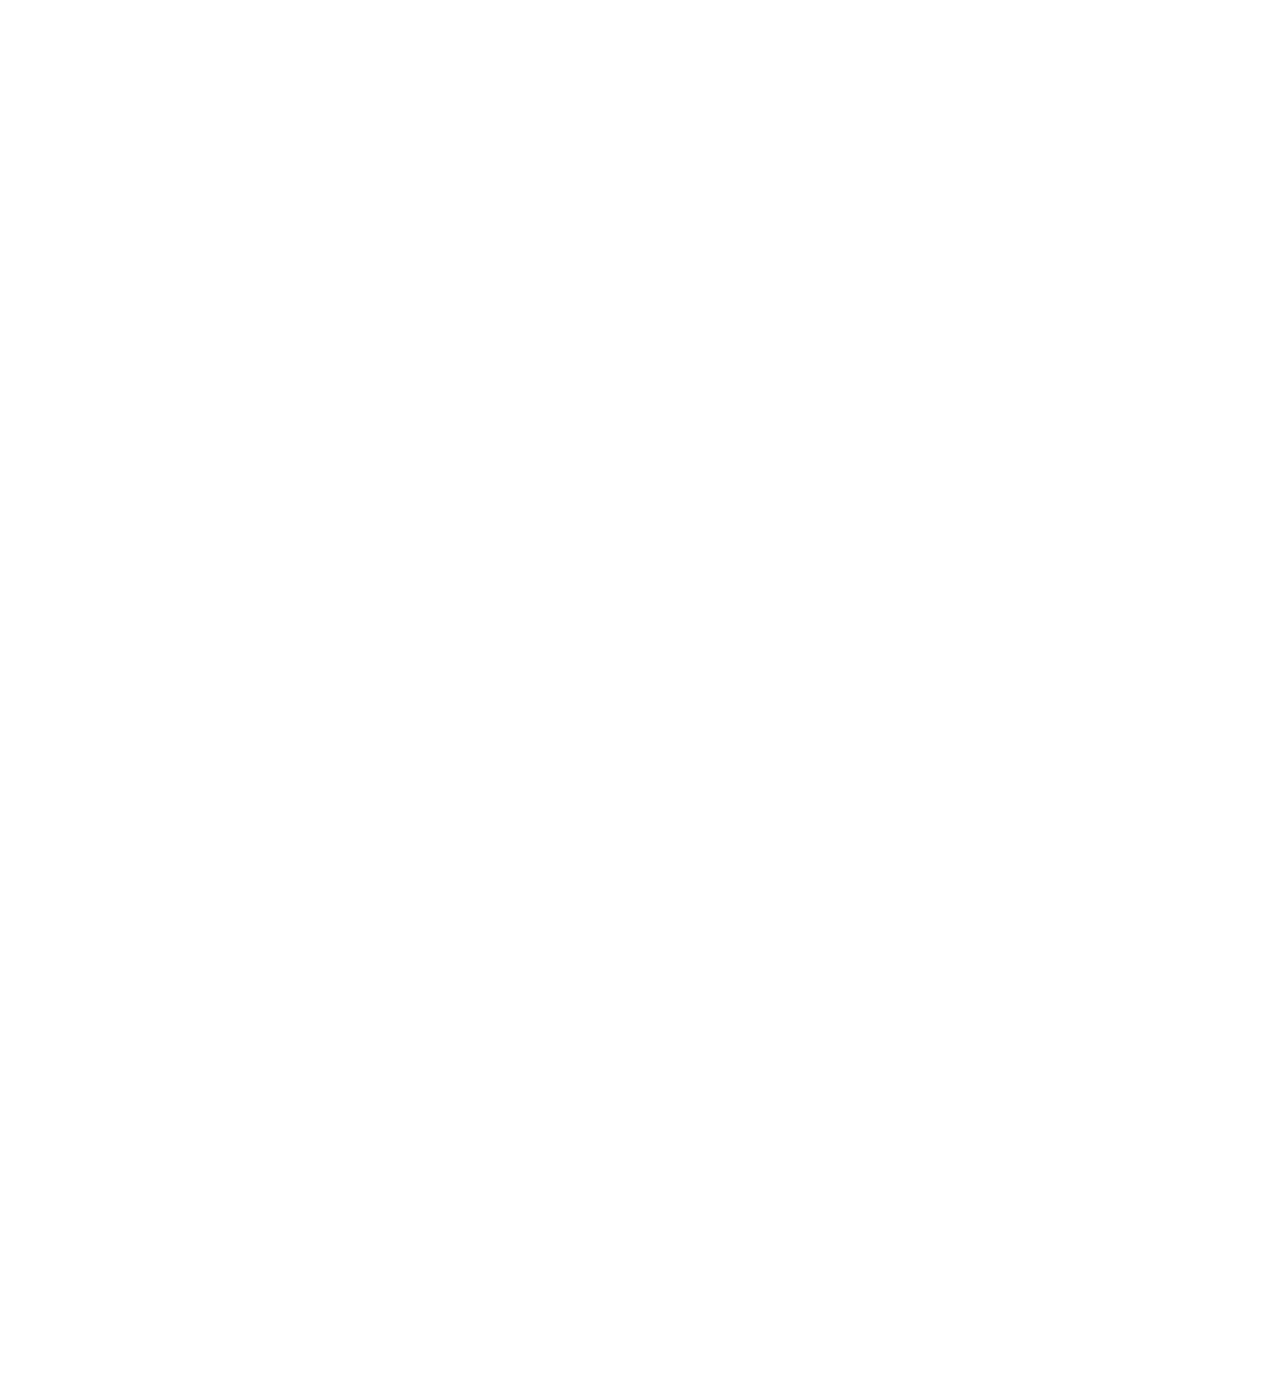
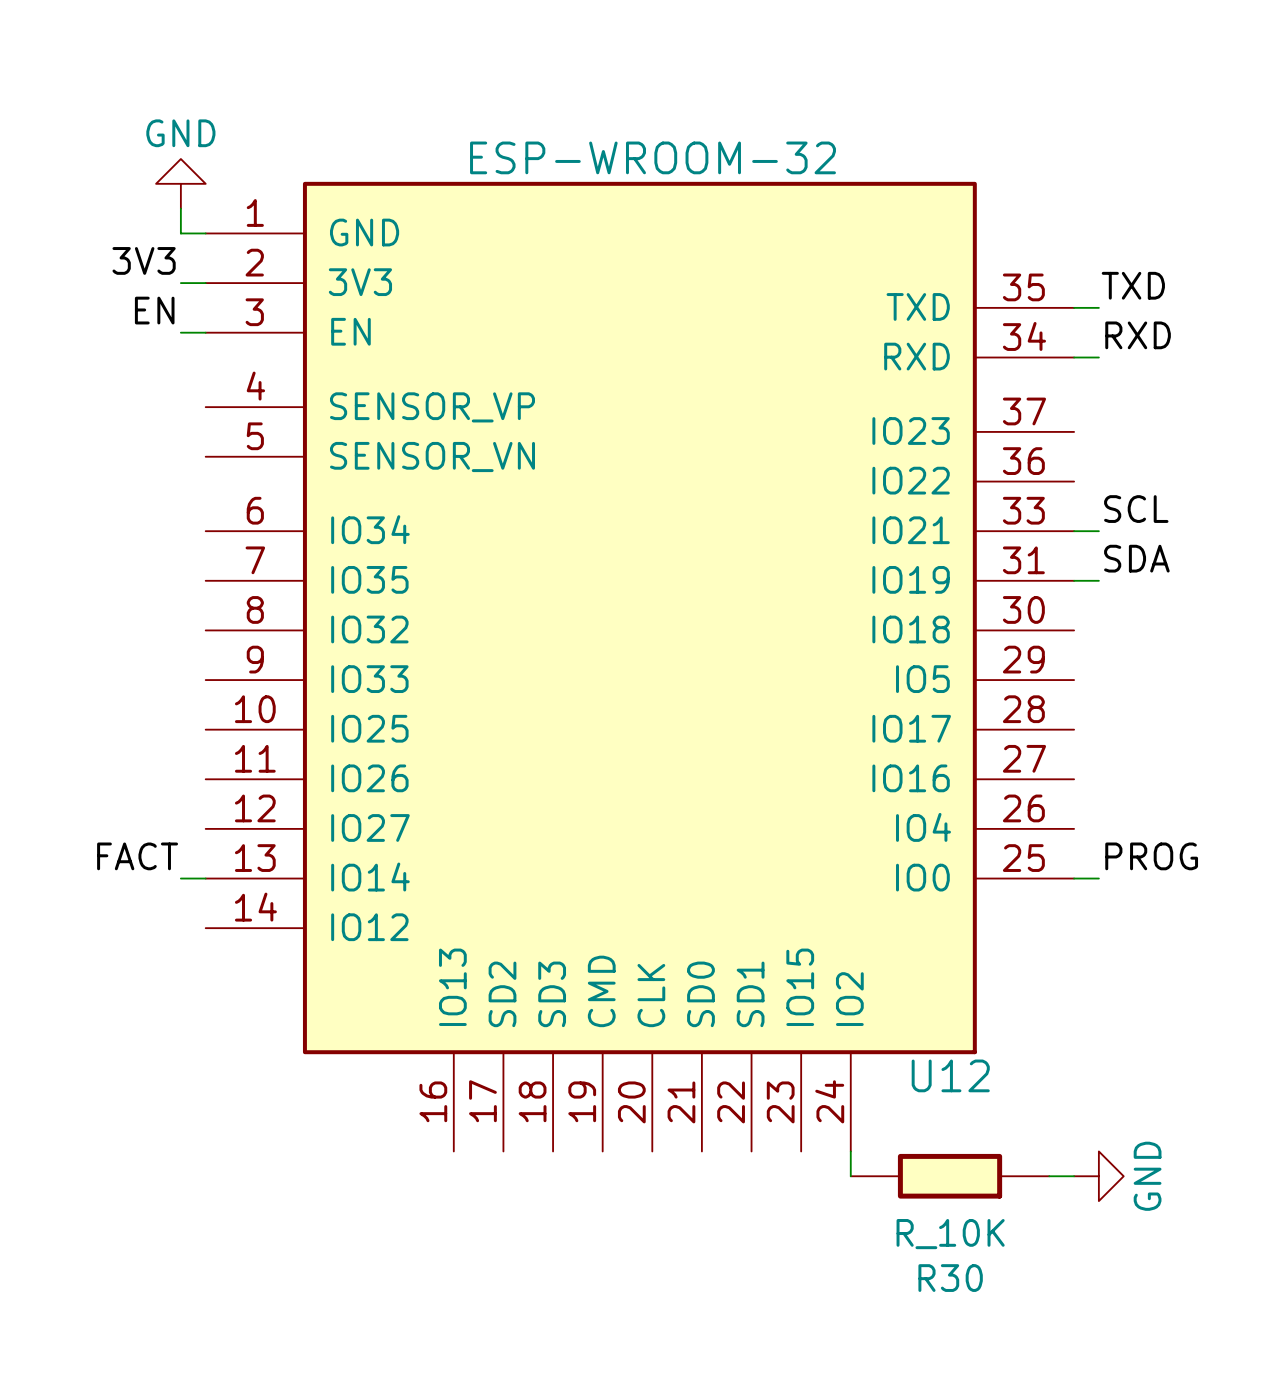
power symbol: none -> GND (180, 183)
wire: none -> (180, 208) (180, 233) (205, 233)
label: none -> 3V3 (144, 260)
wire: none -> (180, 283) (205, 283)
label: none -> TXD (1133, 285)
wire: none -> (1074, 307) (1098, 307)
label: none -> EN (154, 310)
wire: none -> (180, 332) (205, 332)
label: none -> RXD (1138, 335)
wire: none -> (1074, 357) (1098, 357)
label: none -> SCL (1136, 509)
wire: none -> (1074, 531) (1098, 531)
label: none -> SDA (1136, 558)
wire: none -> (1074, 580) (1098, 580)
U12: none -> ESP-WROOM-32 (639, 666)
label: none -> FACT (137, 856)
label: none -> PROG (1151, 856)
wire: none -> (180, 878) (205, 878)
wire: none -> (1074, 878) (1098, 878)
wire: none -> (850, 1151) (850, 1176)
R30: none -> R_10K (950, 1176)
wire: none -> (1049, 1176) (1074, 1176)
power symbol: none -> GND (1098, 1176)

